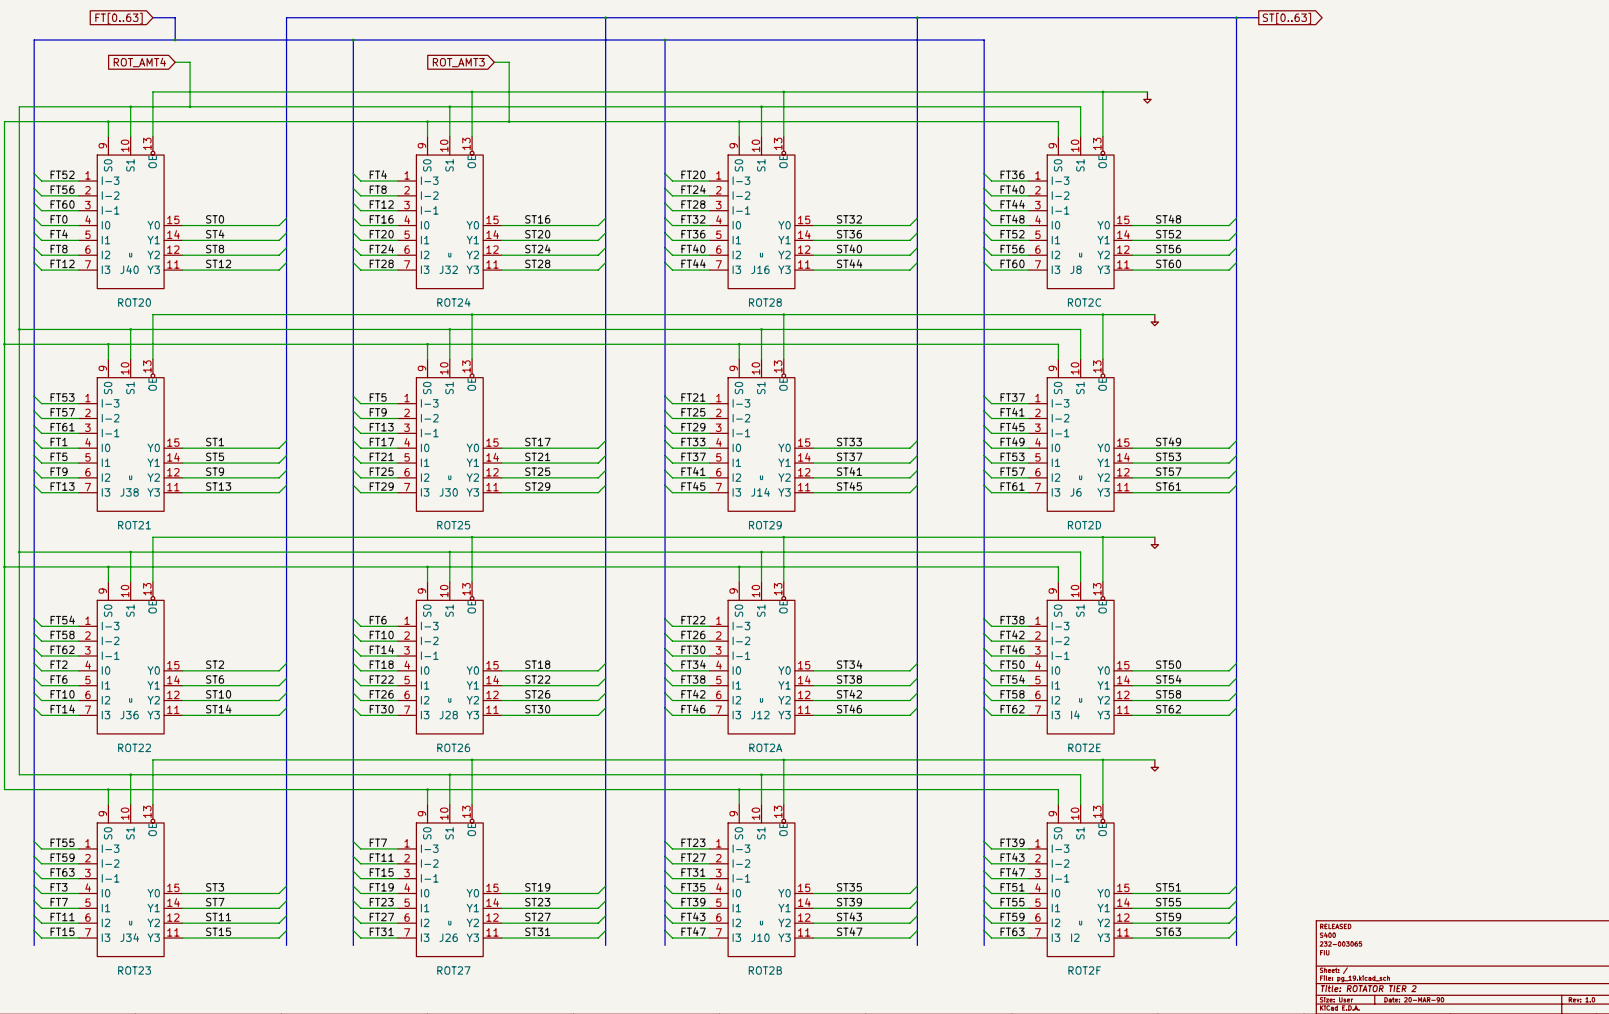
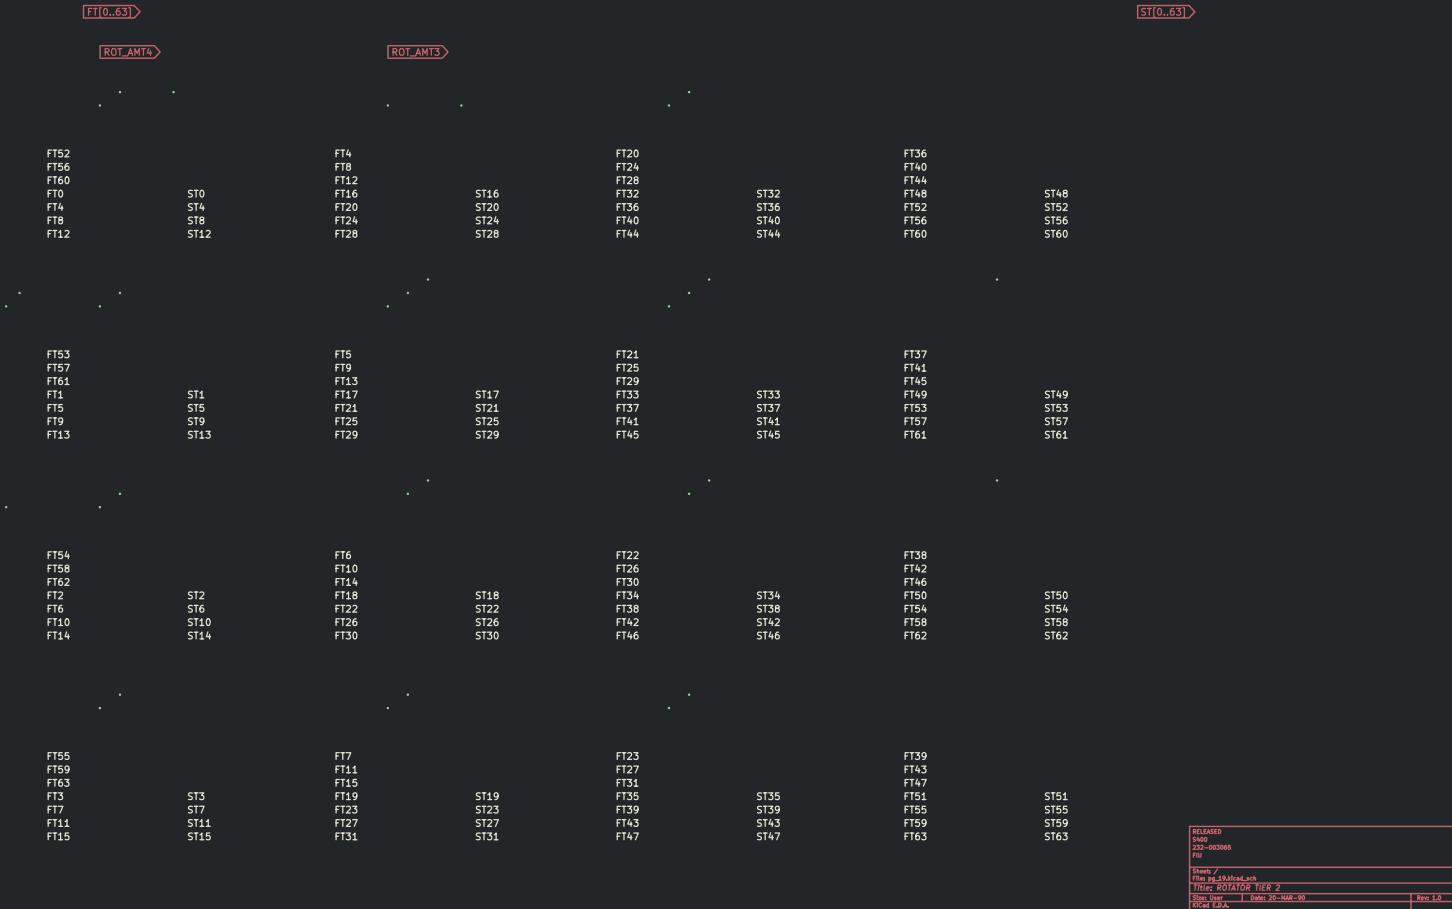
bus: (152, 17) (175, 17) (175, 40) -> none
bus: (605, 17) (605, 945) -> none
junction: (605, 17) -> none
bus: (917, 17) (917, 945) -> none
junction: (917, 17) -> none
bus: (1236, 17) (1236, 945) -> none
junction: (1236, 17) -> none
bus: (1258, 17) (286, 17) (286, 945) -> none
junction: (175, 40) -> none
bus: (353, 40) (353, 945) -> none
junction: (353, 40) -> none
bus: (665, 40) (665, 945) -> none
junction: (665, 40) -> none
wire: (175, 62) (190, 62) (190, 106) -> none
wire: (494, 62) (509, 62) (509, 121) -> none
wire: (472, 91) (472, 136) -> none
wire: (783, 91) (783, 136) -> none
wire: (1102, 91) (1102, 136) -> none
wire: (1147, 91) (152, 91) (152, 136) -> none
power symbol: (1147, 97) -> none
wire: (130, 106) (130, 136) -> none
wire: (449, 106) (449, 136) -> none
wire: (761, 106) (761, 136) -> none
wire: (108, 121) (108, 136) -> none
wire: (427, 121) (427, 136) -> none
wire: (739, 121) (739, 136) -> none
wire: (1058, 136) (1058, 121) (4, 121) (4, 789) (1058, 789) (1058, 804) -> none
wire: (1080, 136) (1080, 106) (19, 106) (19, 774) (1080, 774) (1080, 804) -> none
wire: (34, 173) (41, 181) (78, 181) -> none
wire: (353, 173) (360, 181) (397, 181) -> none
wire: (665, 173) (672, 181) (709, 181) -> none
wire: (984, 173) (991, 181) (1028, 181) -> none
wire: (34, 188) (41, 195) (78, 195) -> none
wire: (353, 188) (360, 195) (397, 195) -> none
wire: (665, 188) (672, 195) (709, 195) -> none
wire: (984, 188) (991, 195) (1028, 195) -> none
wire: (34, 203) (41, 210) (78, 210) -> none
wire: (353, 203) (360, 210) (397, 210) -> none
wire: (665, 203) (672, 210) (709, 210) -> none
wire: (984, 203) (991, 210) (1028, 210) -> none
part: (130, 212) -> none
part: (449, 212) -> none
part: (761, 212) -> none
part: (1080, 212) -> none
wire: (34, 218) (41, 225) (78, 225) -> none
wire: (286, 218) (279, 225) (182, 225) -> none
wire: (353, 218) (360, 225) (397, 225) -> none
wire: (605, 218) (598, 225) (501, 225) -> none
wire: (665, 218) (672, 225) (709, 225) -> none
wire: (917, 218) (909, 225) (813, 225) -> none
wire: (984, 218) (991, 225) (1028, 225) -> none
wire: (1236, 218) (1229, 225) (1132, 225) -> none
wire: (34, 232) (41, 240) (78, 240) -> none
wire: (286, 232) (279, 240) (182, 240) -> none
wire: (353, 232) (360, 240) (397, 240) -> none
wire: (605, 232) (598, 240) (501, 240) -> none
wire: (665, 232) (672, 240) (709, 240) -> none
wire: (917, 232) (909, 240) (813, 240) -> none
wire: (984, 232) (991, 240) (1028, 240) -> none
wire: (1236, 232) (1229, 240) (1132, 240) -> none
wire: (34, 247) (41, 255) (78, 255) -> none
wire: (286, 247) (279, 255) (182, 255) -> none
wire: (353, 247) (360, 255) (397, 255) -> none
wire: (605, 247) (598, 255) (501, 255) -> none
wire: (665, 247) (672, 255) (709, 255) -> none
wire: (917, 247) (909, 255) (813, 255) -> none
wire: (984, 247) (991, 255) (1028, 255) -> none
wire: (1236, 247) (1229, 255) (1132, 255) -> none
wire: (34, 262) (41, 270) (78, 270) -> none
wire: (286, 262) (279, 270) (182, 270) -> none
wire: (353, 262) (360, 270) (397, 270) -> none
wire: (605, 262) (598, 270) (501, 270) -> none
wire: (665, 262) (672, 270) (709, 270) -> none
wire: (917, 262) (909, 270) (813, 270) -> none
wire: (984, 262) (991, 270) (1028, 270) -> none
wire: (1236, 262) (1229, 270) (1132, 270) -> none
wire: (472, 314) (472, 359) -> none
wire: (783, 314) (783, 359) -> none
wire: (1102, 314) (1102, 359) -> none
wire: (1154, 314) (152, 314) (152, 359) -> none
power symbol: (1154, 320) -> none
wire: (19, 329) (1080, 329) (1080, 359) -> none
wire: (130, 329) (130, 359) -> none
wire: (449, 329) (449, 359) -> none
wire: (761, 329) (761, 359) -> none
wire: (4, 344) (1058, 344) (1058, 359) -> none
wire: (108, 344) (108, 359) -> none
wire: (427, 344) (427, 359) -> none
wire: (739, 344) (739, 359) -> none
wire: (34, 396) (41, 403) (78, 403) -> none
wire: (353, 396) (360, 403) (397, 403) -> none
wire: (665, 396) (672, 403) (709, 403) -> none
wire: (984, 396) (991, 403) (1028, 403) -> none
wire: (34, 411) (41, 418) (78, 418) -> none
wire: (353, 411) (360, 418) (397, 418) -> none
wire: (665, 411) (672, 418) (709, 418) -> none
wire: (984, 411) (991, 418) (1028, 418) -> none
wire: (34, 425) (41, 433) (78, 433) -> none
wire: (353, 425) (360, 433) (397, 433) -> none
wire: (665, 425) (672, 433) (709, 433) -> none
wire: (984, 425) (991, 433) (1028, 433) -> none
part: (130, 435) -> none
part: (449, 435) -> none
part: (761, 435) -> none
part: (1080, 435) -> none
wire: (34, 440) (41, 448) (78, 448) -> none
wire: (286, 440) (279, 448) (182, 448) -> none
wire: (353, 440) (360, 448) (397, 448) -> none
wire: (605, 440) (598, 448) (501, 448) -> none
wire: (665, 440) (672, 448) (709, 448) -> none
wire: (917, 440) (909, 448) (813, 448) -> none
wire: (984, 440) (991, 448) (1028, 448) -> none
wire: (1236, 440) (1229, 448) (1132, 448) -> none
wire: (34, 455) (41, 463) (78, 463) -> none
wire: (286, 455) (279, 463) (182, 463) -> none
wire: (353, 455) (360, 463) (397, 463) -> none
wire: (605, 455) (598, 463) (501, 463) -> none
wire: (665, 455) (672, 463) (709, 463) -> none
wire: (917, 455) (909, 463) (813, 463) -> none
wire: (984, 455) (991, 463) (1028, 463) -> none
wire: (1236, 455) (1229, 463) (1132, 463) -> none
wire: (34, 470) (41, 477) (78, 477) -> none
wire: (286, 470) (279, 477) (182, 477) -> none
wire: (353, 470) (360, 477) (397, 477) -> none
wire: (605, 470) (598, 477) (501, 477) -> none
wire: (665, 470) (672, 477) (709, 477) -> none
wire: (917, 470) (909, 477) (813, 477) -> none
wire: (984, 470) (991, 477) (1028, 477) -> none
wire: (1236, 470) (1229, 477) (1132, 477) -> none
wire: (34, 485) (41, 492) (78, 492) -> none
wire: (286, 485) (279, 492) (182, 492) -> none
wire: (353, 485) (360, 492) (397, 492) -> none
wire: (605, 485) (598, 492) (501, 492) -> none
wire: (665, 485) (672, 492) (709, 492) -> none
wire: (917, 485) (909, 492) (813, 492) -> none
wire: (984, 485) (991, 492) (1028, 492) -> none
wire: (1236, 485) (1229, 492) (1132, 492) -> none
wire: (472, 537) (472, 581) -> none
wire: (783, 537) (783, 581) -> none
wire: (1102, 537) (1102, 581) -> none
wire: (1154, 537) (152, 537) (152, 581) -> none
power symbol: (1154, 542) -> none
wire: (19, 552) (1080, 552) (1080, 581) -> none
junction: (19, 552) -> none
wire: (130, 552) (130, 581) -> none
wire: (449, 552) (449, 581) -> none
wire: (761, 552) (761, 581) -> none
wire: (4, 566) (1058, 566) (1058, 581) -> none
wire: (108, 566) (108, 581) -> none
wire: (427, 566) (427, 581) -> none
junction: (427, 566) -> none
wire: (739, 566) (739, 581) -> none
wire: (34, 618) (41, 626) (78, 626) -> none
wire: (353, 618) (360, 626) (397, 626) -> none
wire: (665, 618) (672, 626) (709, 626) -> none
wire: (984, 618) (991, 626) (1028, 626) -> none
wire: (34, 633) (41, 641) (78, 641) -> none
wire: (353, 633) (360, 641) (397, 641) -> none
wire: (665, 633) (672, 641) (709, 641) -> none
wire: (984, 633) (991, 641) (1028, 641) -> none
wire: (34, 648) (41, 656) (78, 656) -> none
wire: (353, 648) (360, 656) (397, 656) -> none
wire: (665, 648) (672, 656) (709, 656) -> none
wire: (984, 648) (991, 656) (1028, 656) -> none
part: (130, 657) -> none
part: (449, 657) -> none
part: (761, 657) -> none
part: (1080, 657) -> none
wire: (34, 663) (41, 670) (78, 670) -> none
wire: (286, 663) (279, 670) (182, 670) -> none
wire: (353, 663) (360, 670) (397, 670) -> none
wire: (605, 663) (598, 670) (501, 670) -> none
wire: (665, 663) (672, 670) (709, 670) -> none
wire: (917, 663) (909, 670) (813, 670) -> none
wire: (984, 663) (991, 670) (1028, 670) -> none
wire: (1236, 663) (1229, 670) (1132, 670) -> none
wire: (34, 678) (41, 685) (78, 685) -> none
wire: (286, 678) (279, 685) (182, 685) -> none
wire: (353, 678) (360, 685) (397, 685) -> none
wire: (605, 678) (598, 685) (501, 685) -> none
wire: (665, 678) (672, 685) (709, 685) -> none
wire: (917, 678) (909, 685) (813, 685) -> none
wire: (984, 678) (991, 685) (1028, 685) -> none
wire: (1236, 678) (1229, 685) (1132, 685) -> none
wire: (34, 693) (41, 700) (78, 700) -> none
wire: (286, 693) (279, 700) (182, 700) -> none
wire: (353, 693) (360, 700) (397, 700) -> none
wire: (605, 693) (598, 700) (501, 700) -> none
wire: (665, 693) (672, 700) (709, 700) -> none
wire: (917, 693) (909, 700) (813, 700) -> none
wire: (984, 693) (991, 700) (1028, 700) -> none
wire: (1236, 693) (1229, 700) (1132, 700) -> none
wire: (34, 707) (41, 715) (78, 715) -> none
wire: (286, 707) (279, 715) (182, 715) -> none
wire: (353, 707) (360, 715) (397, 715) -> none
wire: (605, 707) (598, 715) (501, 715) -> none
wire: (665, 707) (672, 715) (709, 715) -> none
wire: (917, 707) (909, 715) (813, 715) -> none
wire: (984, 707) (991, 715) (1028, 715) -> none
wire: (1236, 707) (1229, 715) (1132, 715) -> none
wire: (472, 759) (472, 804) -> none
wire: (783, 759) (783, 804) -> none
wire: (1102, 759) (1102, 804) -> none
wire: (1154, 759) (152, 759) (152, 804) -> none
power symbol: (1154, 765) -> none
wire: (130, 774) (130, 804) -> none
wire: (449, 774) (449, 804) -> none
wire: (761, 774) (761, 804) -> none
wire: (108, 789) (108, 804) -> none
wire: (427, 789) (427, 804) -> none
wire: (739, 789) (739, 804) -> none
wire: (34, 841) (41, 848) (78, 848) -> none
wire: (353, 841) (360, 848) (397, 848) -> none
wire: (665, 841) (672, 848) (709, 848) -> none
wire: (984, 841) (991, 848) (1028, 848) -> none
wire: (34, 856) (41, 863) (78, 863) -> none
wire: (353, 856) (360, 863) (397, 863) -> none
wire: (665, 856) (672, 863) (709, 863) -> none
wire: (984, 856) (991, 863) (1028, 863) -> none
wire: (34, 871) (41, 878) (78, 878) -> none
wire: (353, 871) (360, 878) (397, 878) -> none
wire: (665, 871) (672, 878) (709, 878) -> none
wire: (984, 871) (991, 878) (1028, 878) -> none
part: (130, 880) -> none
part: (449, 880) -> none
part: (761, 880) -> none
part: (1080, 880) -> none
wire: (34, 886) (41, 893) (78, 893) -> none
wire: (286, 886) (279, 893) (182, 893) -> none
wire: (353, 886) (360, 893) (397, 893) -> none
wire: (605, 886) (598, 893) (501, 893) -> none
wire: (665, 886) (672, 893) (709, 893) -> none
wire: (917, 886) (909, 893) (813, 893) -> none
wire: (984, 886) (991, 893) (1028, 893) -> none
wire: (1236, 886) (1229, 893) (1132, 893) -> none
wire: (34, 900) (41, 908) (78, 908) -> none
wire: (286, 900) (279, 908) (182, 908) -> none
wire: (353, 900) (360, 908) (397, 908) -> none
wire: (605, 900) (598, 908) (501, 908) -> none
wire: (665, 900) (672, 908) (709, 908) -> none
wire: (917, 900) (909, 908) (813, 908) -> none
wire: (984, 900) (991, 908) (1028, 908) -> none
wire: (1236, 900) (1229, 908) (1132, 908) -> none
wire: (34, 915) (41, 923) (78, 923) -> none
wire: (286, 915) (279, 923) (182, 923) -> none
wire: (353, 915) (360, 923) (397, 923) -> none
wire: (605, 915) (598, 923) (501, 923) -> none
wire: (665, 915) (672, 923) (709, 923) -> none
wire: (917, 915) (909, 923) (813, 923) -> none
wire: (984, 915) (991, 923) (1028, 923) -> none
wire: (1236, 915) (1229, 923) (1132, 923) -> none
wire: (34, 930) (41, 938) (78, 938) -> none
wire: (286, 930) (279, 938) (182, 938) -> none
wire: (353, 930) (360, 938) (397, 938) -> none
wire: (605, 930) (598, 938) (501, 938) -> none
wire: (665, 930) (672, 938) (709, 938) -> none
wire: (917, 930) (909, 938) (813, 938) -> none
wire: (984, 930) (991, 938) (1028, 938) -> none
wire: (1236, 930) (1229, 938) (1132, 938) -> none
bus: (34, 945) (34, 40) (984, 40) (984, 945) -> none

